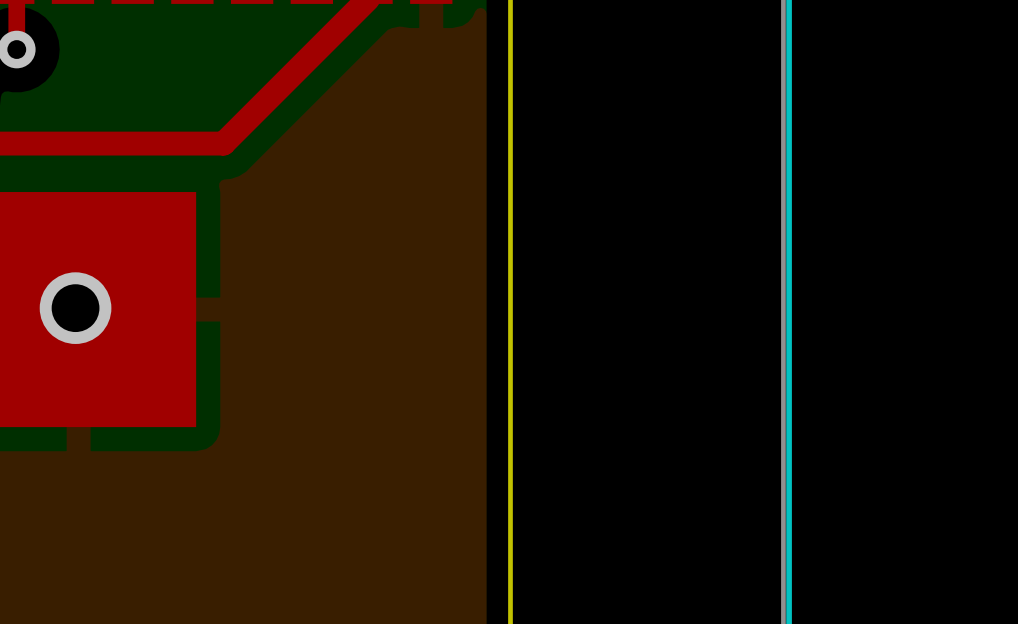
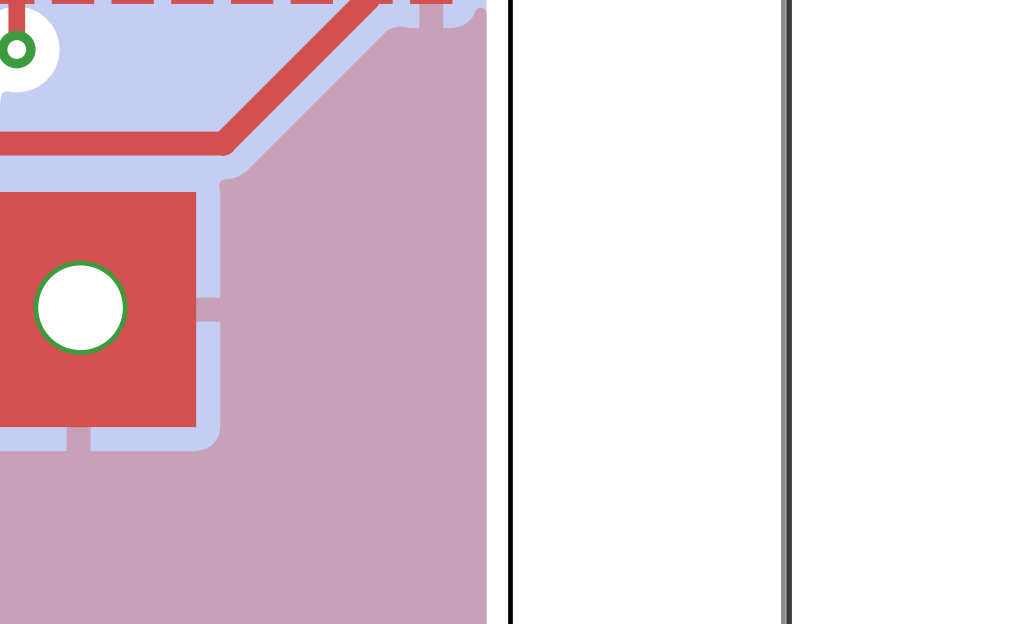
via size: [39, 272, 112, 344] -> [33, 260, 128, 355]

